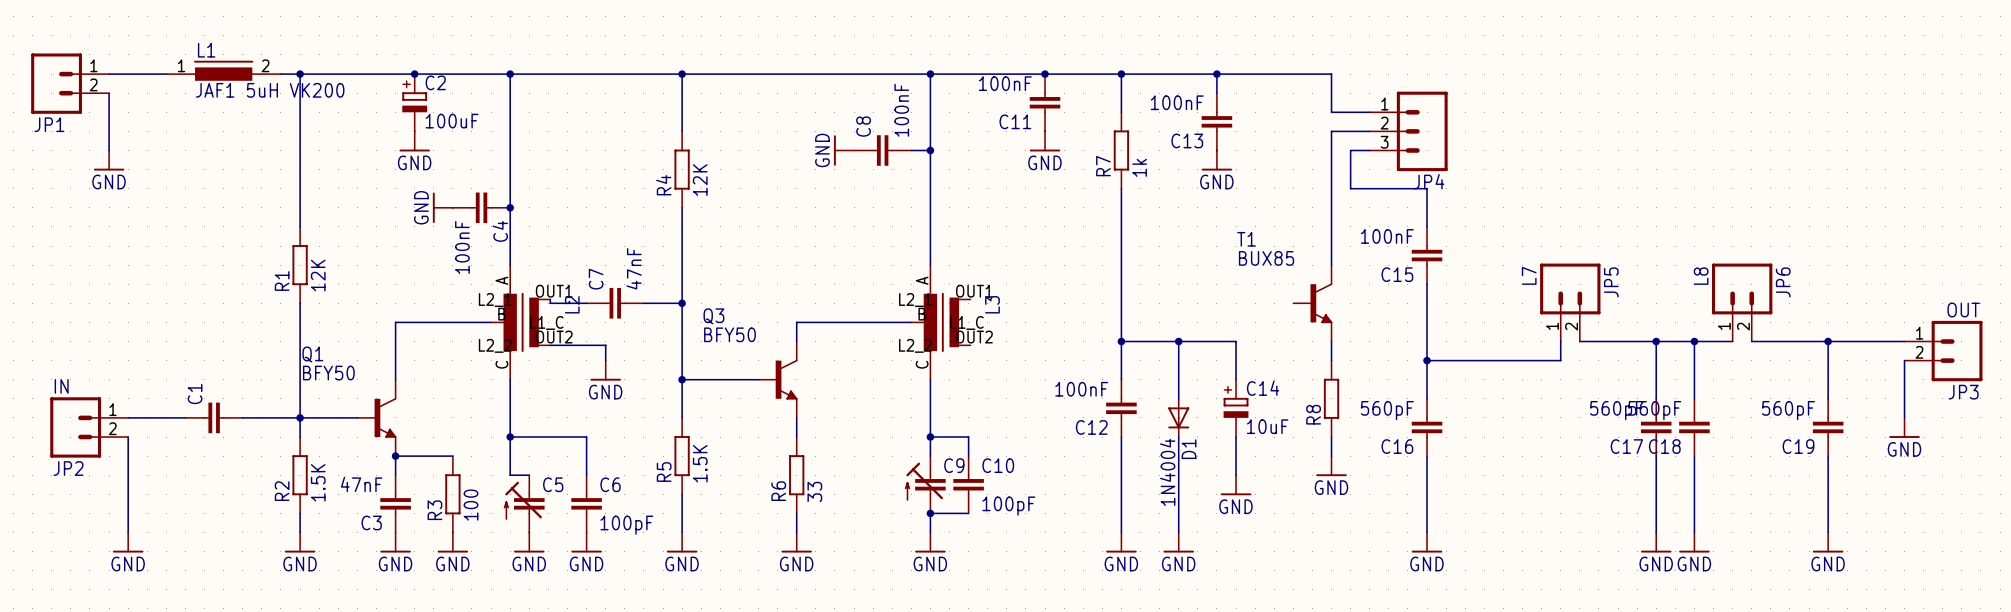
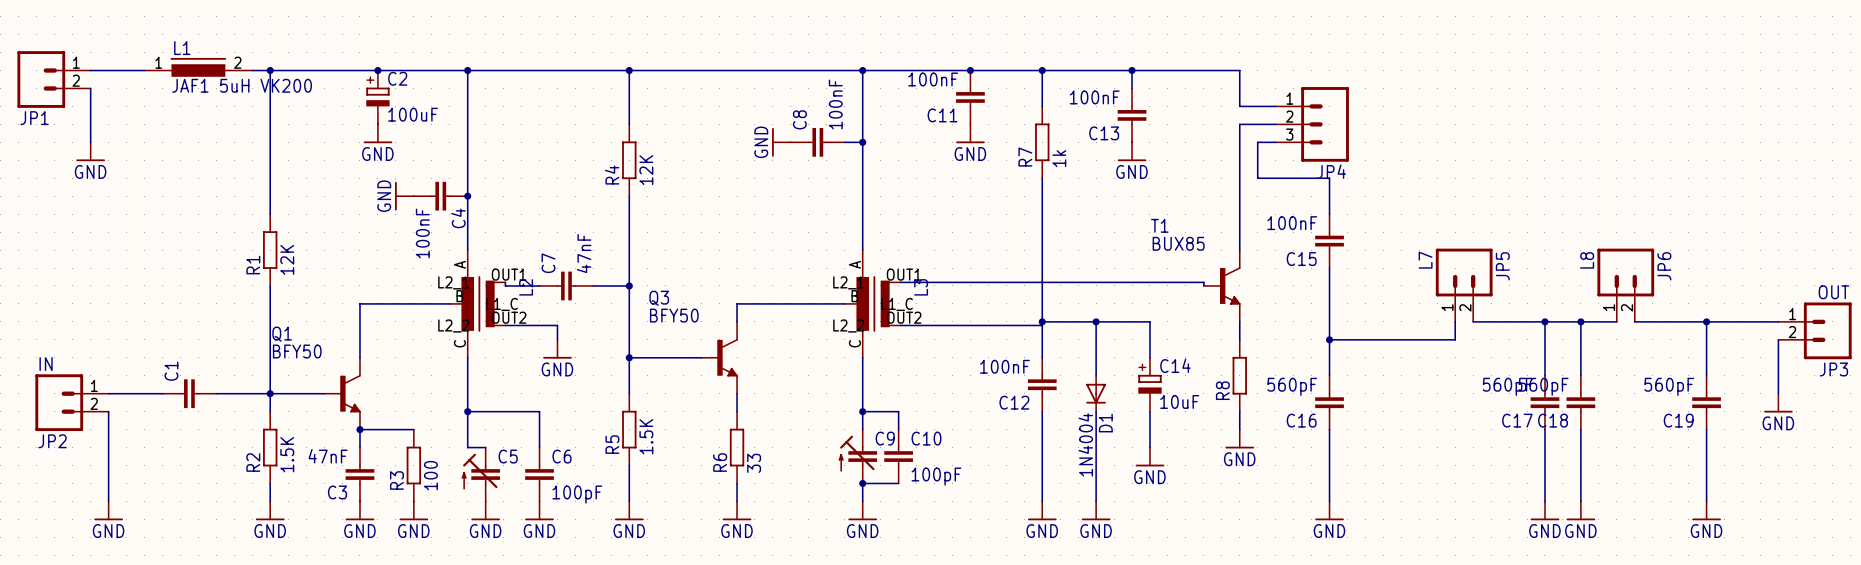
wire: none -> (900, 282) (1203, 282) (1203, 285)
wire: none -> (900, 325) (1042, 325)

